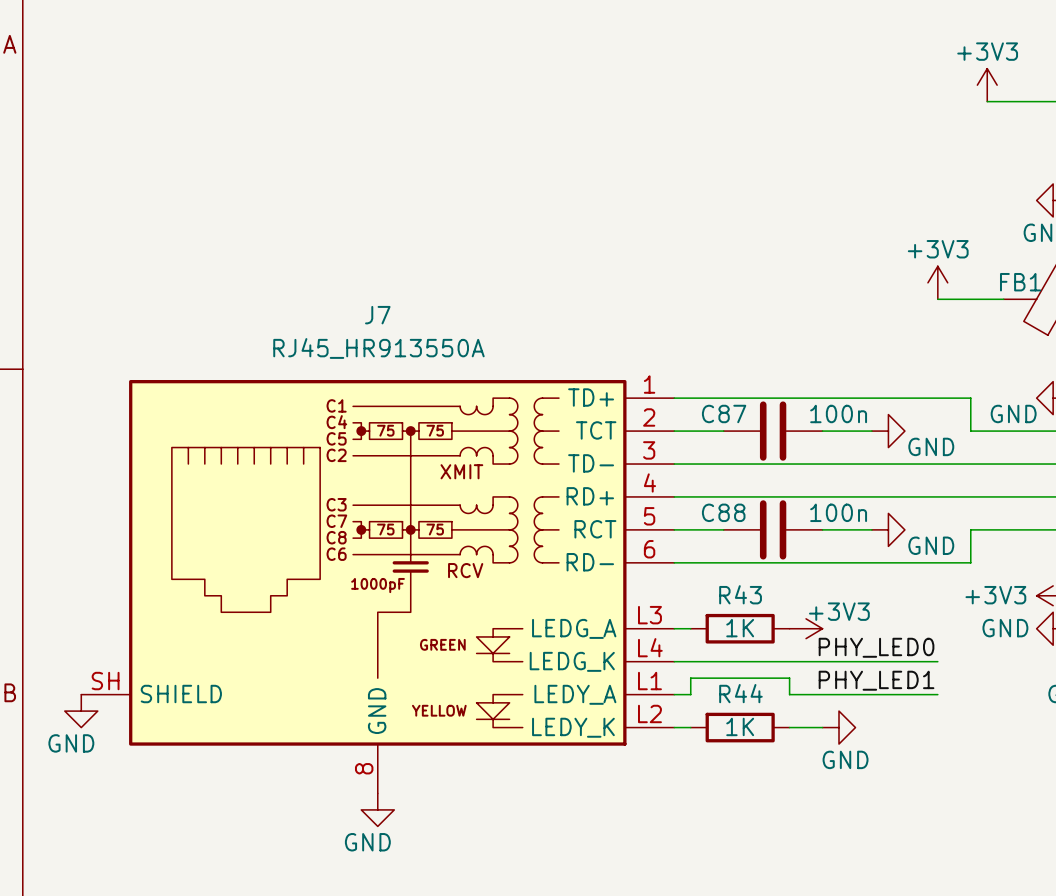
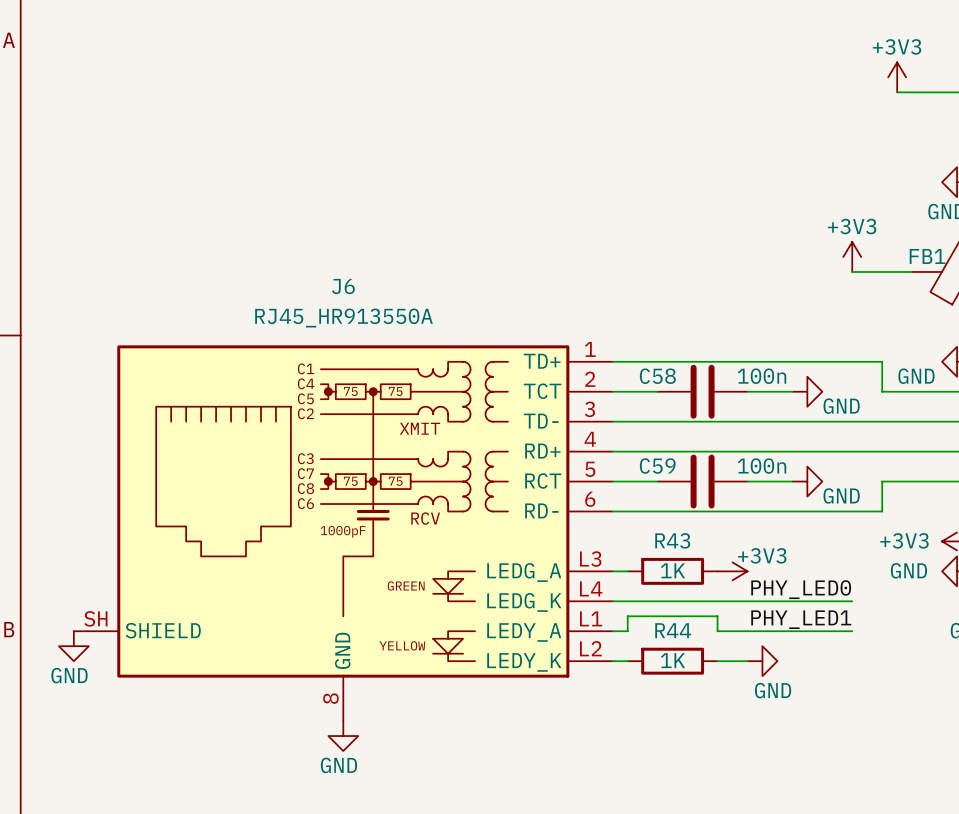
J7 name: J7 (377, 315) -> J6 (343, 286)
C87 name: C87 (724, 413) -> C58 (657, 376)
C88 name: C88 (723, 512) -> C59 (657, 466)

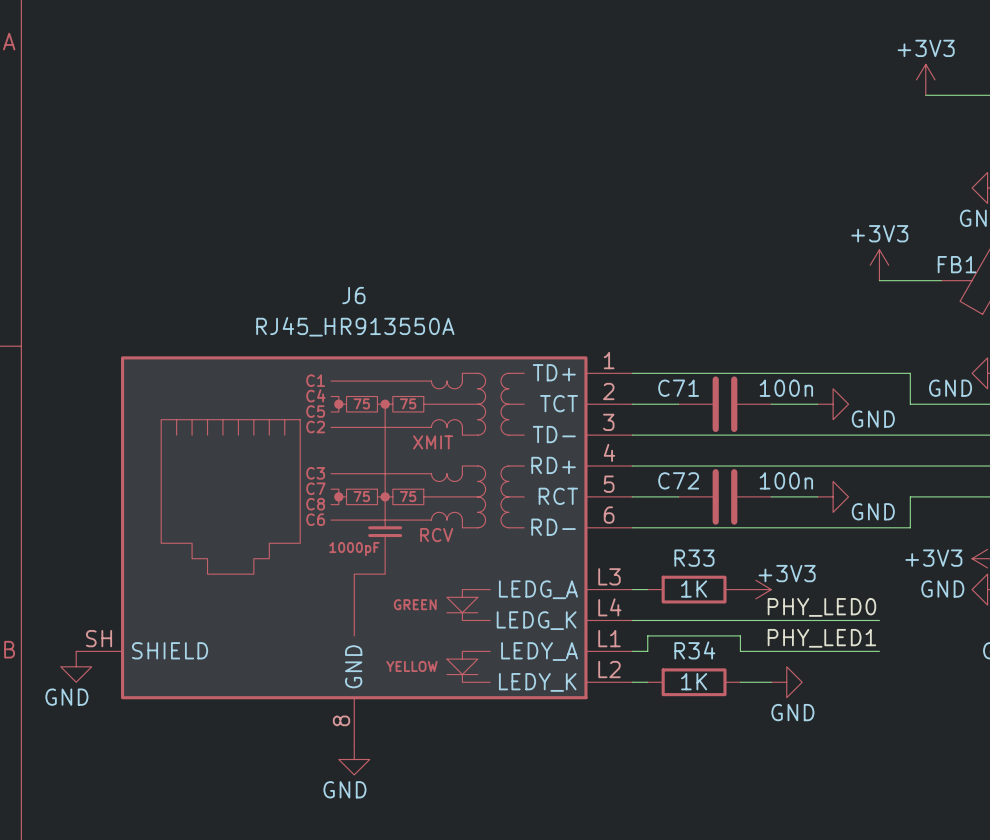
C58 name: C58 (657, 376) -> C71 (678, 388)
C59 name: C59 (657, 466) -> C72 (678, 480)
R43 name: R43 (672, 540) -> R33 (694, 558)
R44 name: R44 (673, 630) -> R34 (694, 650)

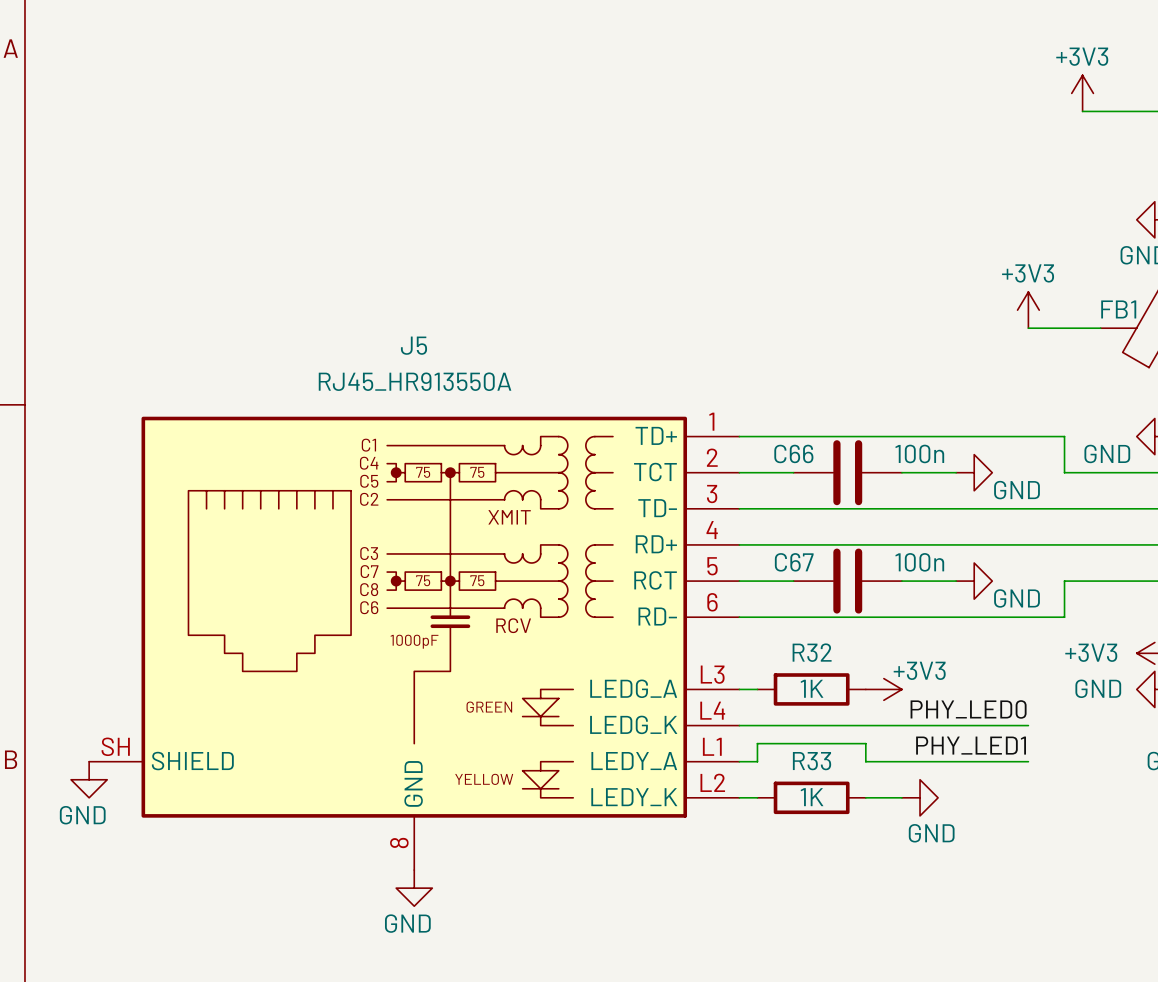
J6 name: J6 (353, 295) -> J5 (413, 345)
C71 name: C71 (678, 388) -> C66 (793, 453)
C72 name: C72 (678, 480) -> C67 (794, 562)
R33 name: R33 (694, 558) -> R32 (812, 652)
R34 name: R34 (694, 650) -> R33 (812, 761)

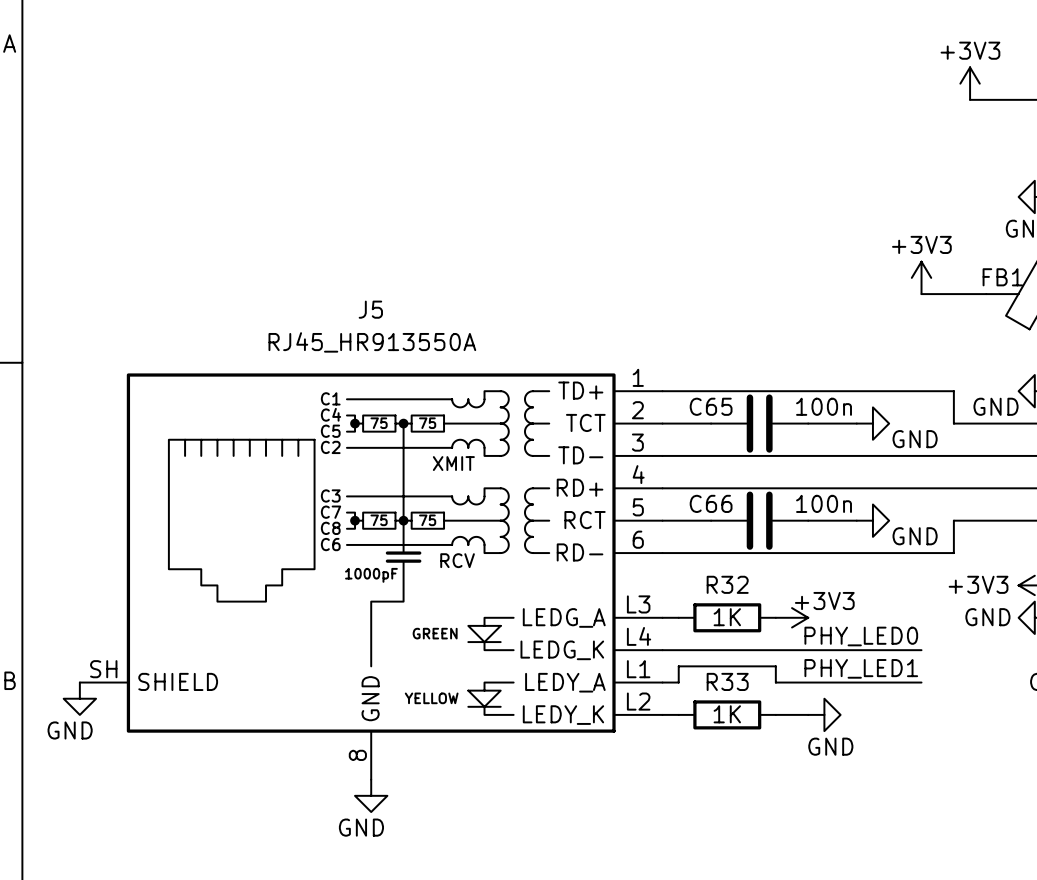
C66 name: C66 (793, 453) -> C65 (711, 406)
C67 name: C67 (794, 562) -> C66 (711, 503)

